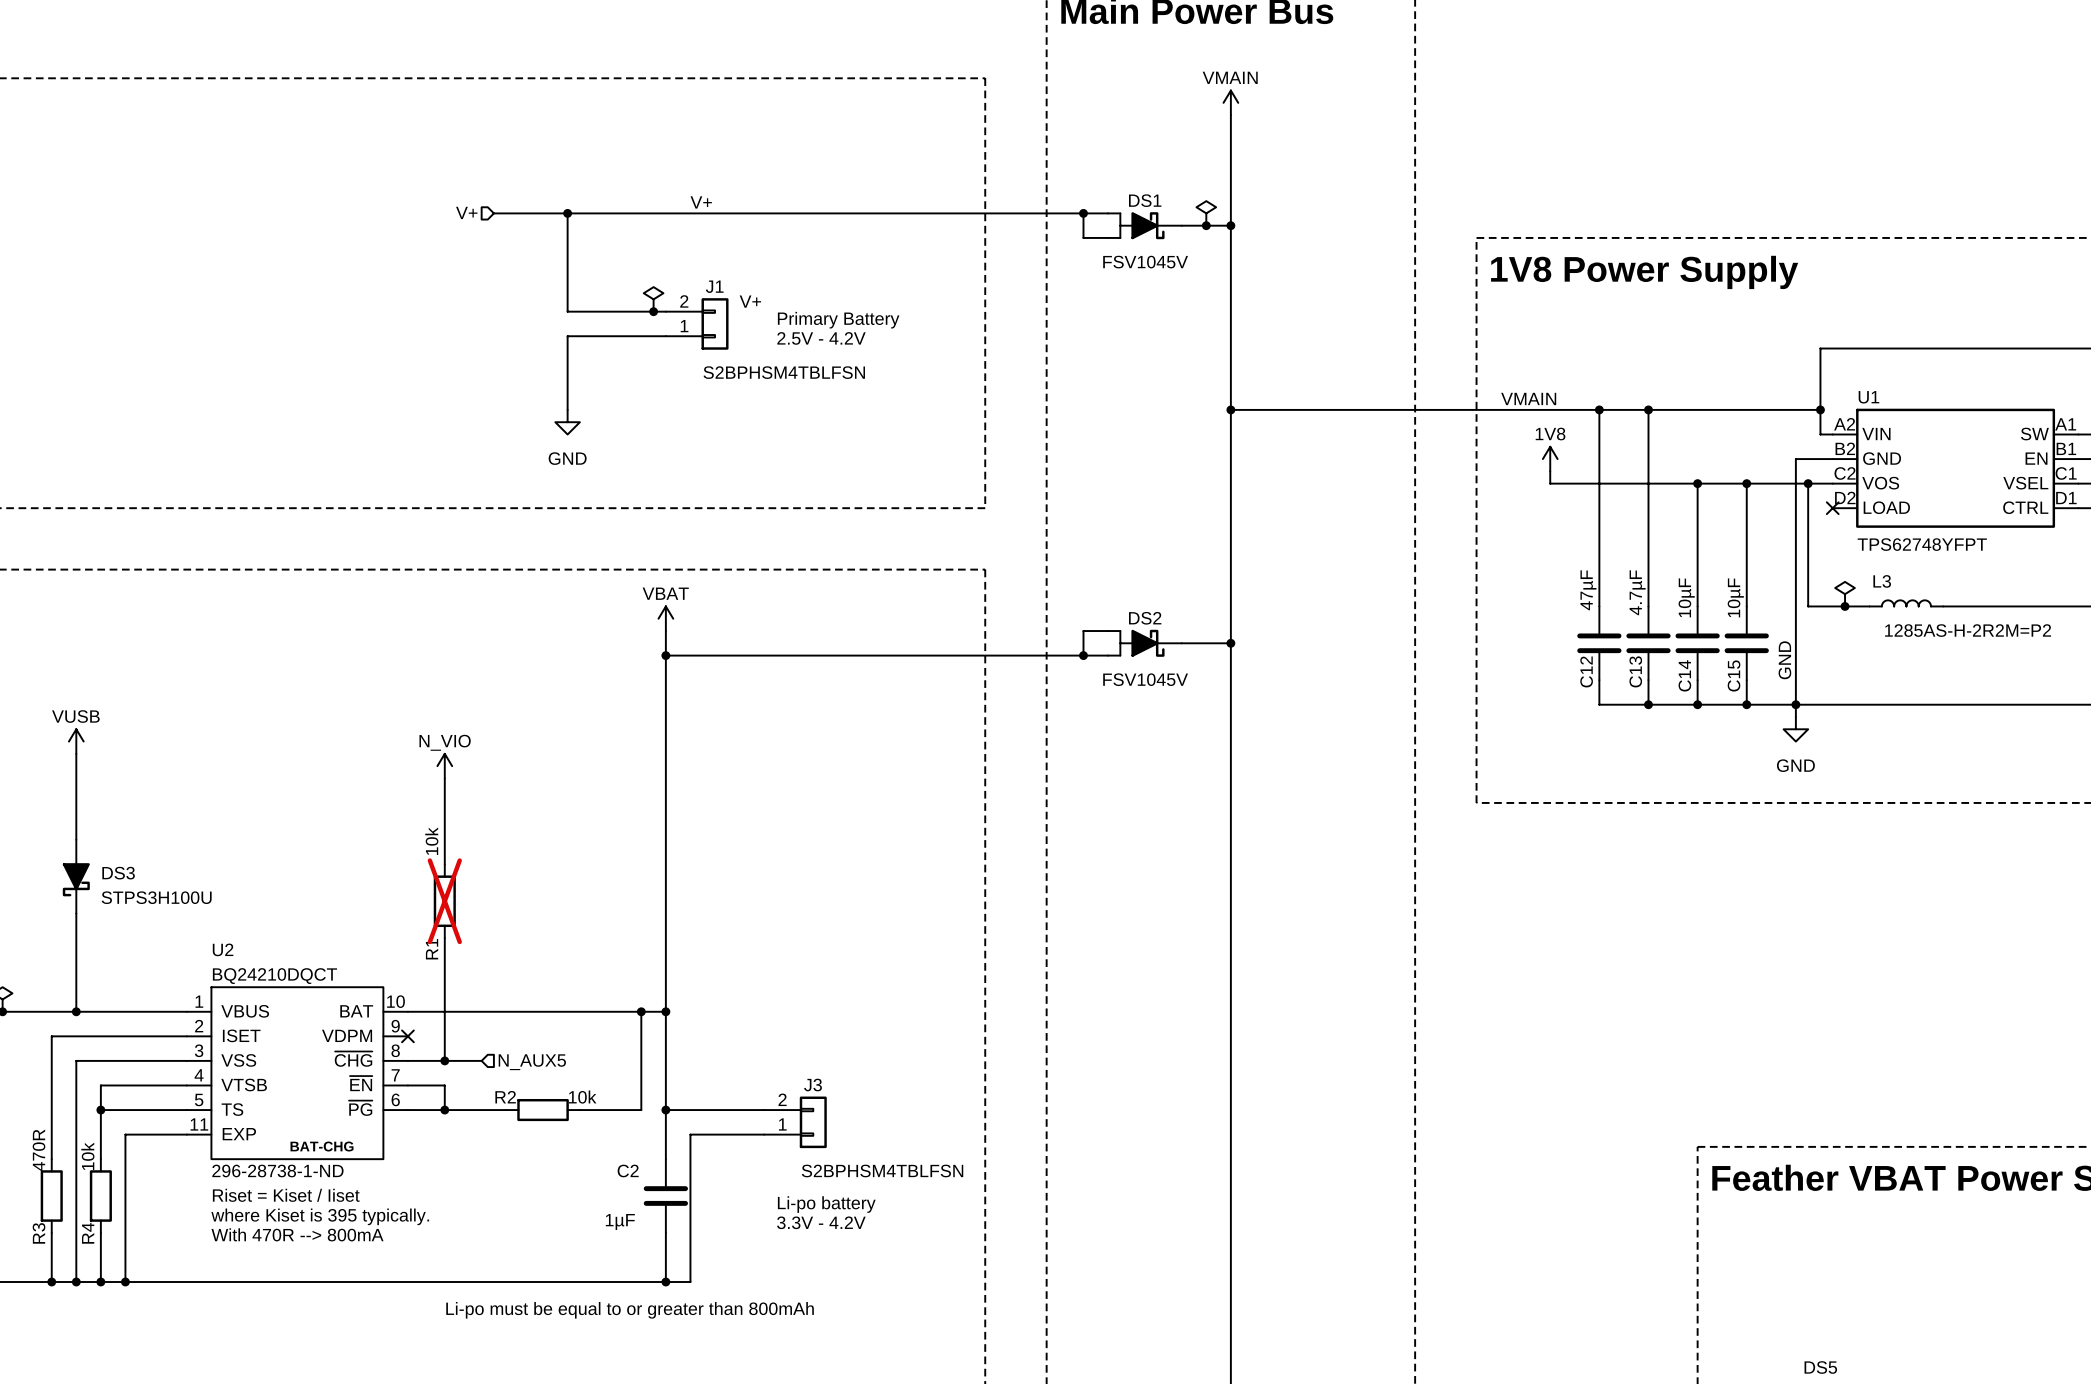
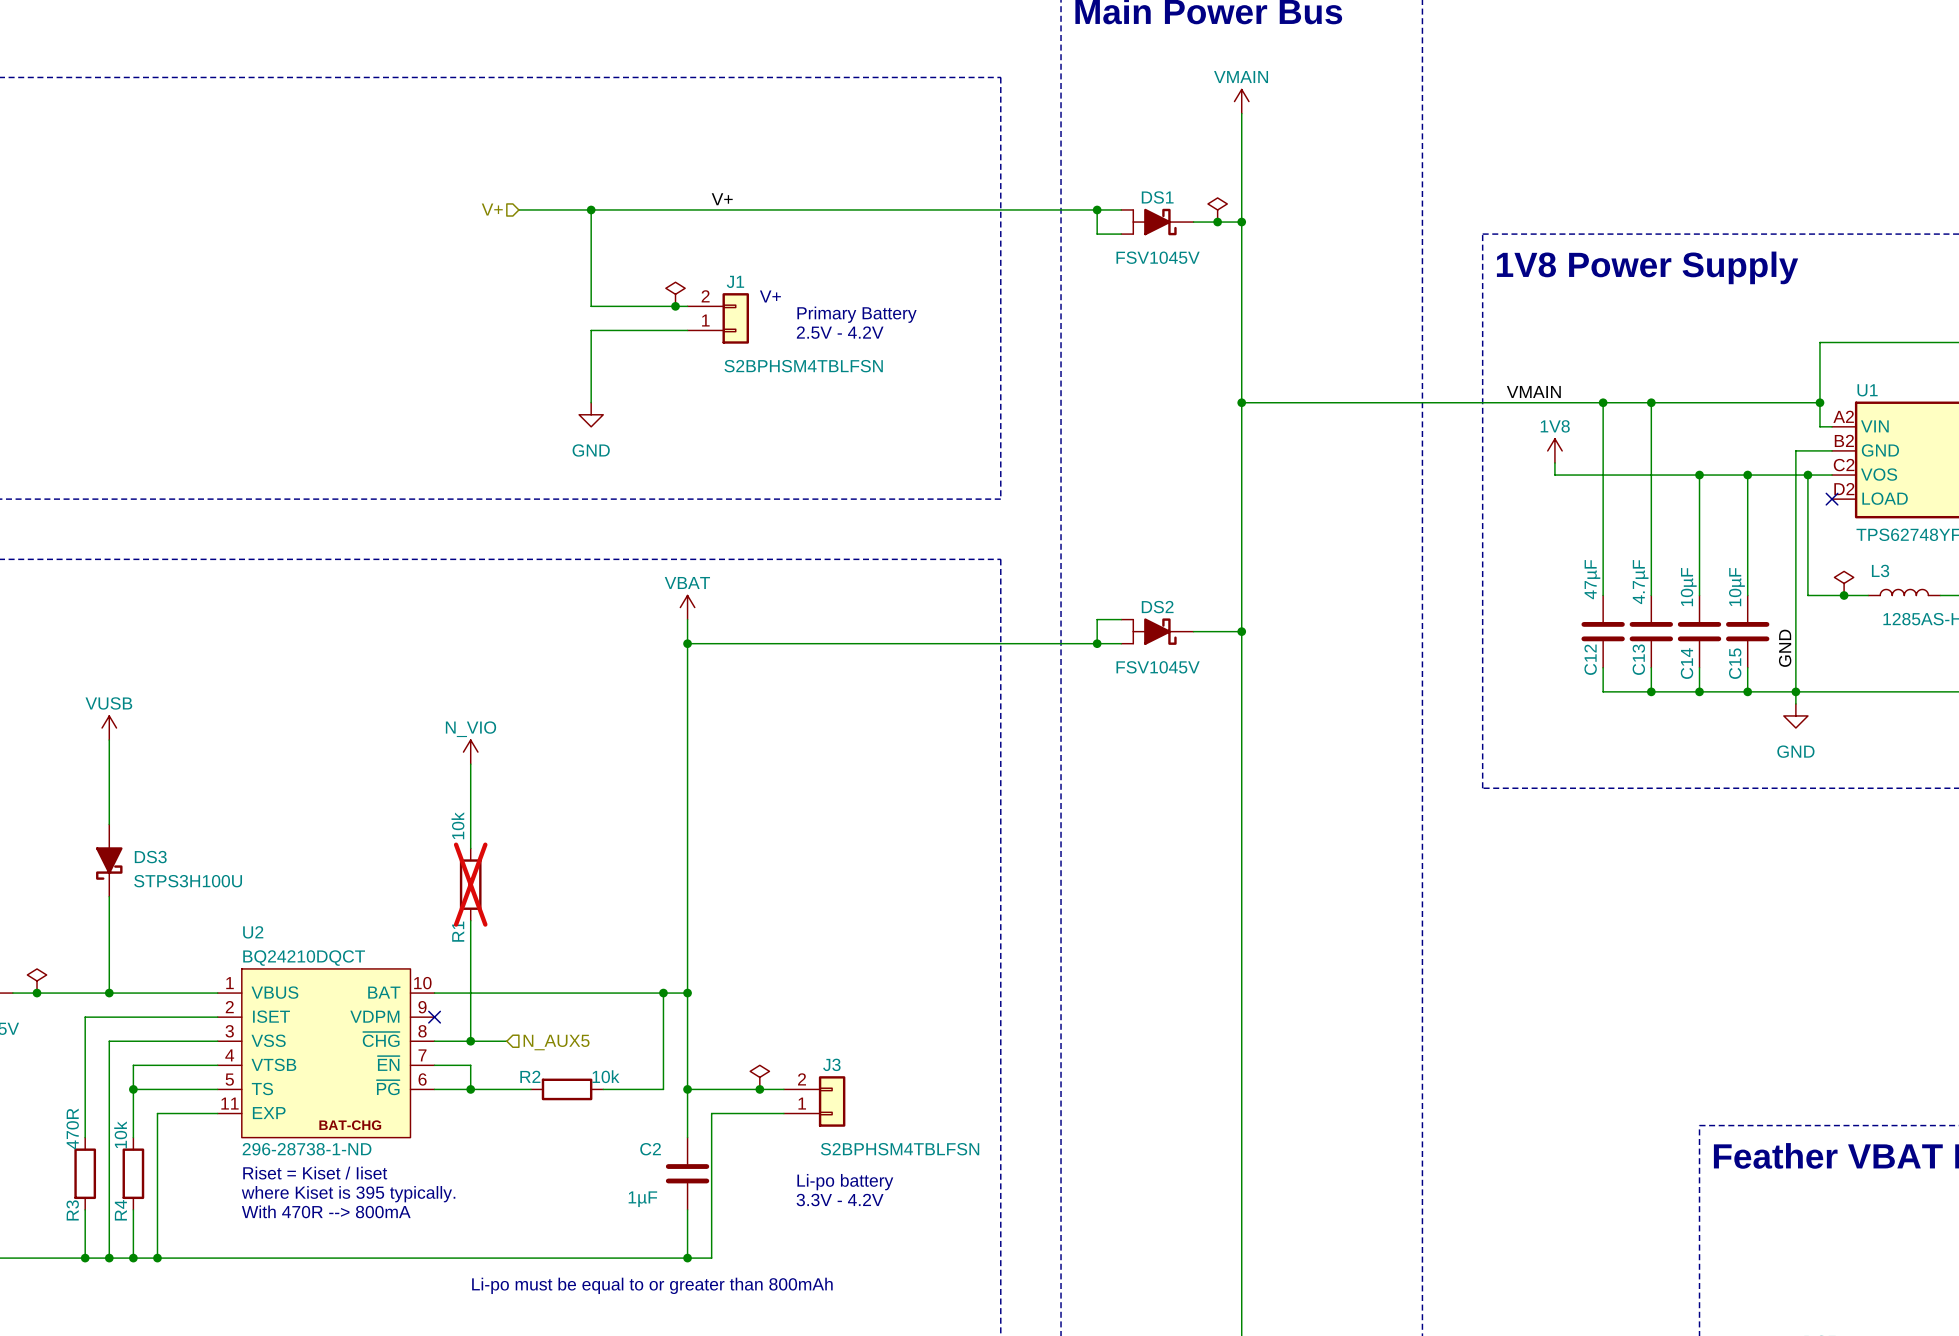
power symbol: none -> (759, 1077)
junction: none -> (759, 1089)

